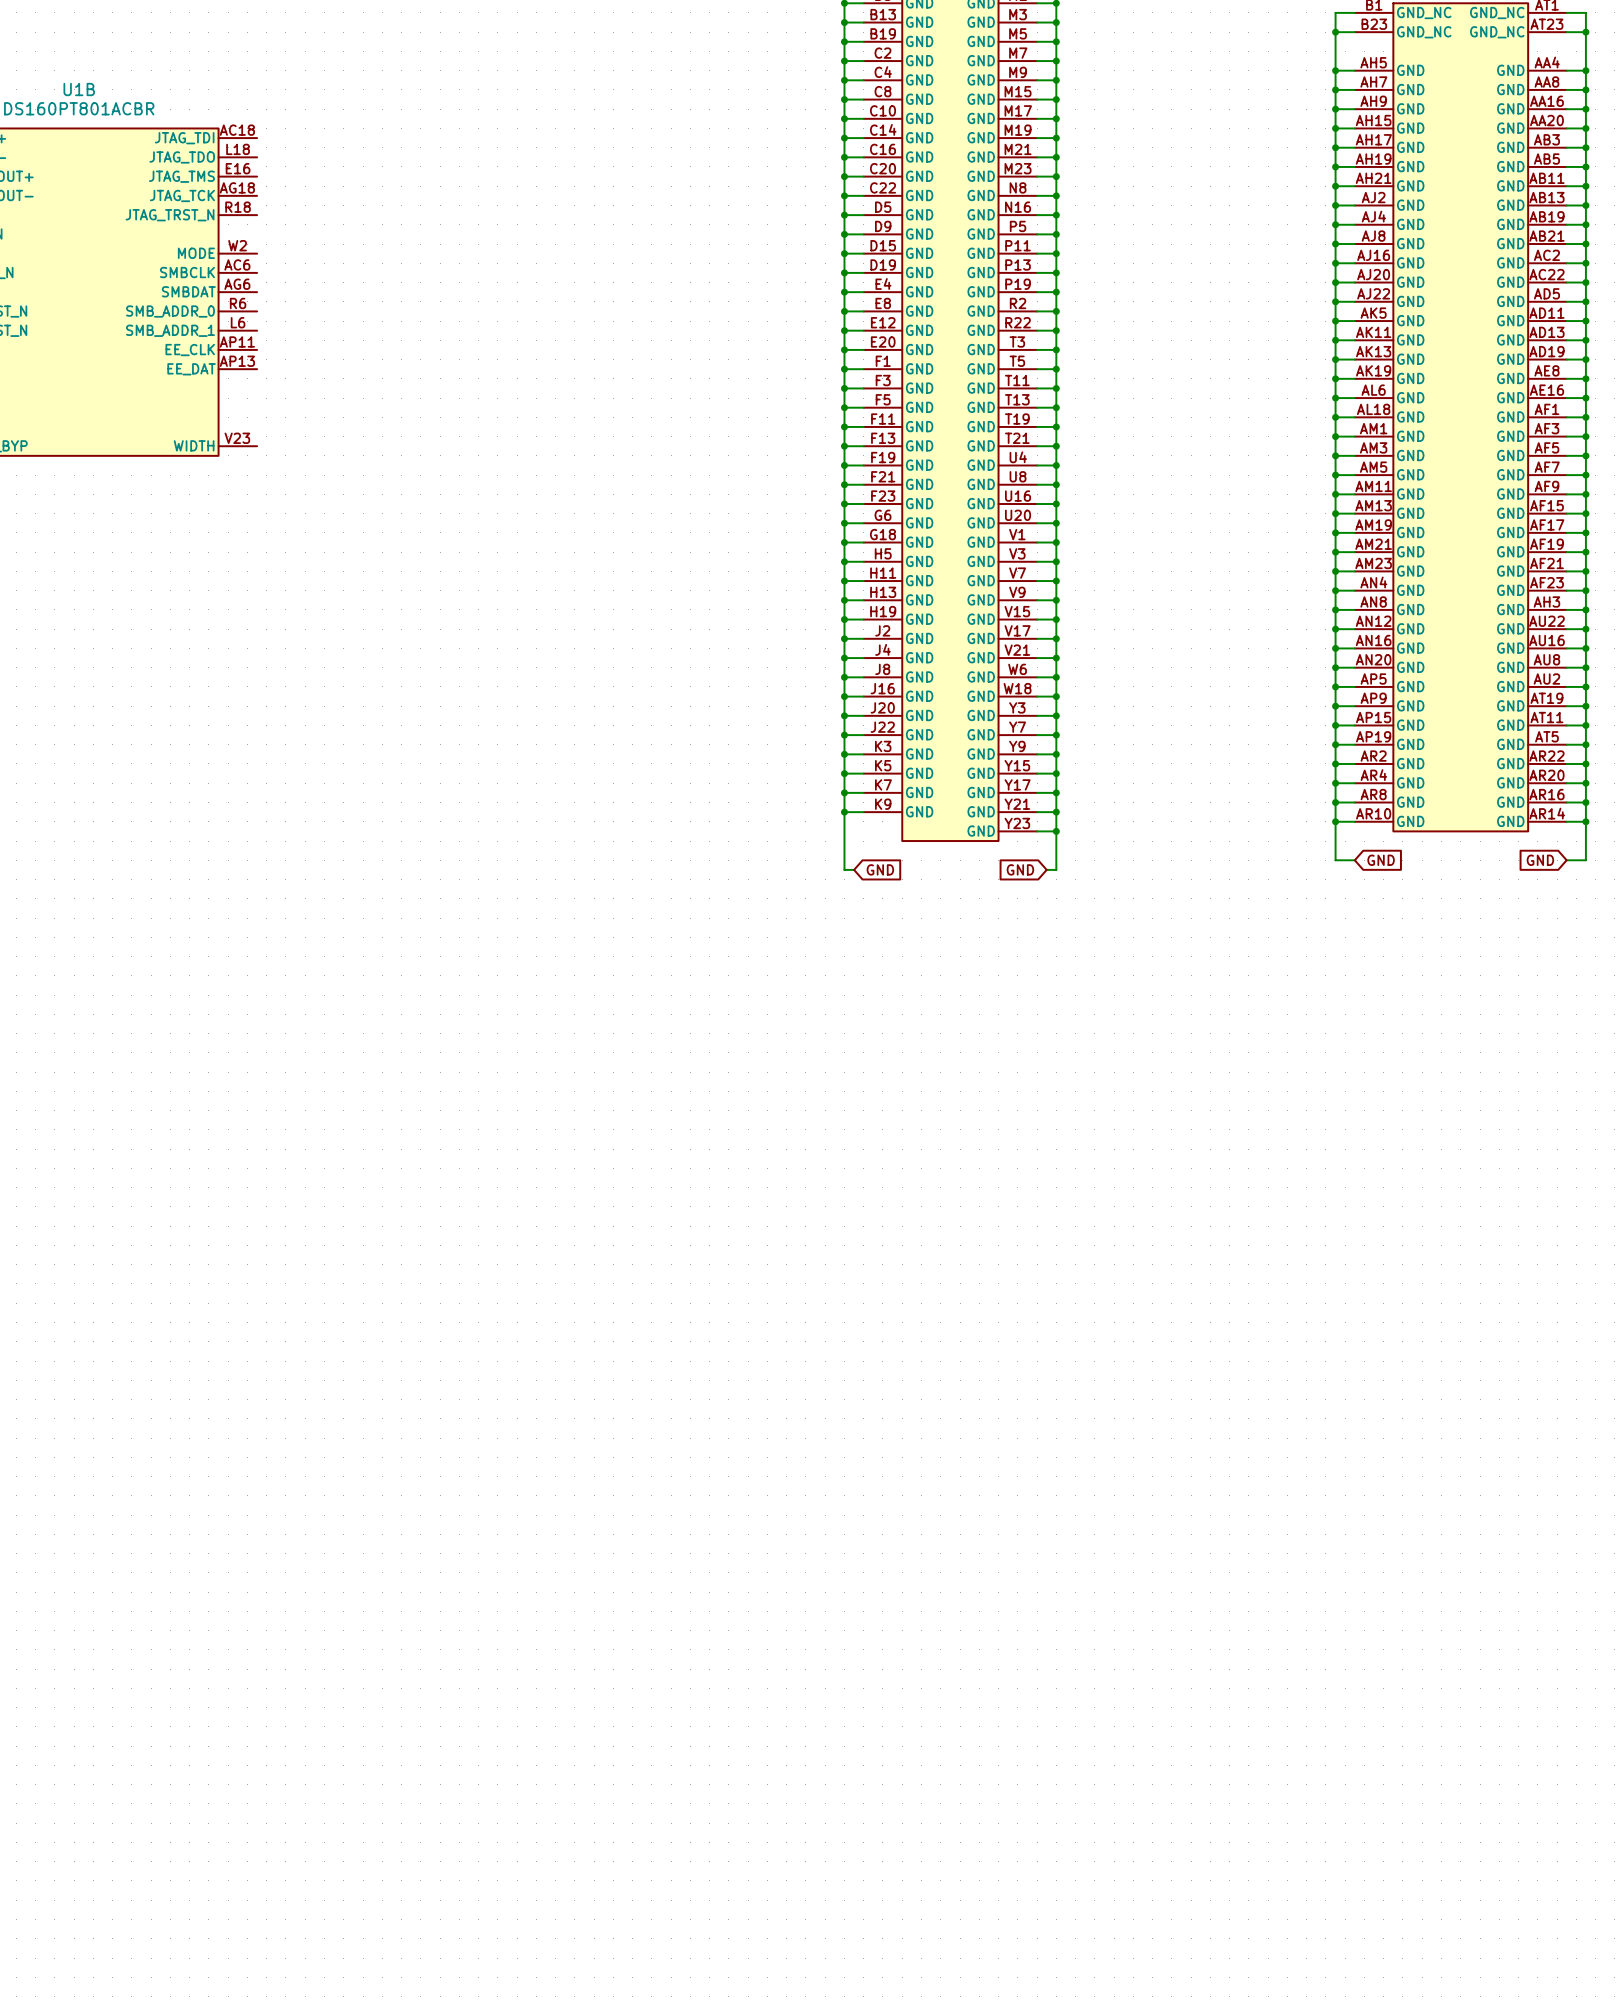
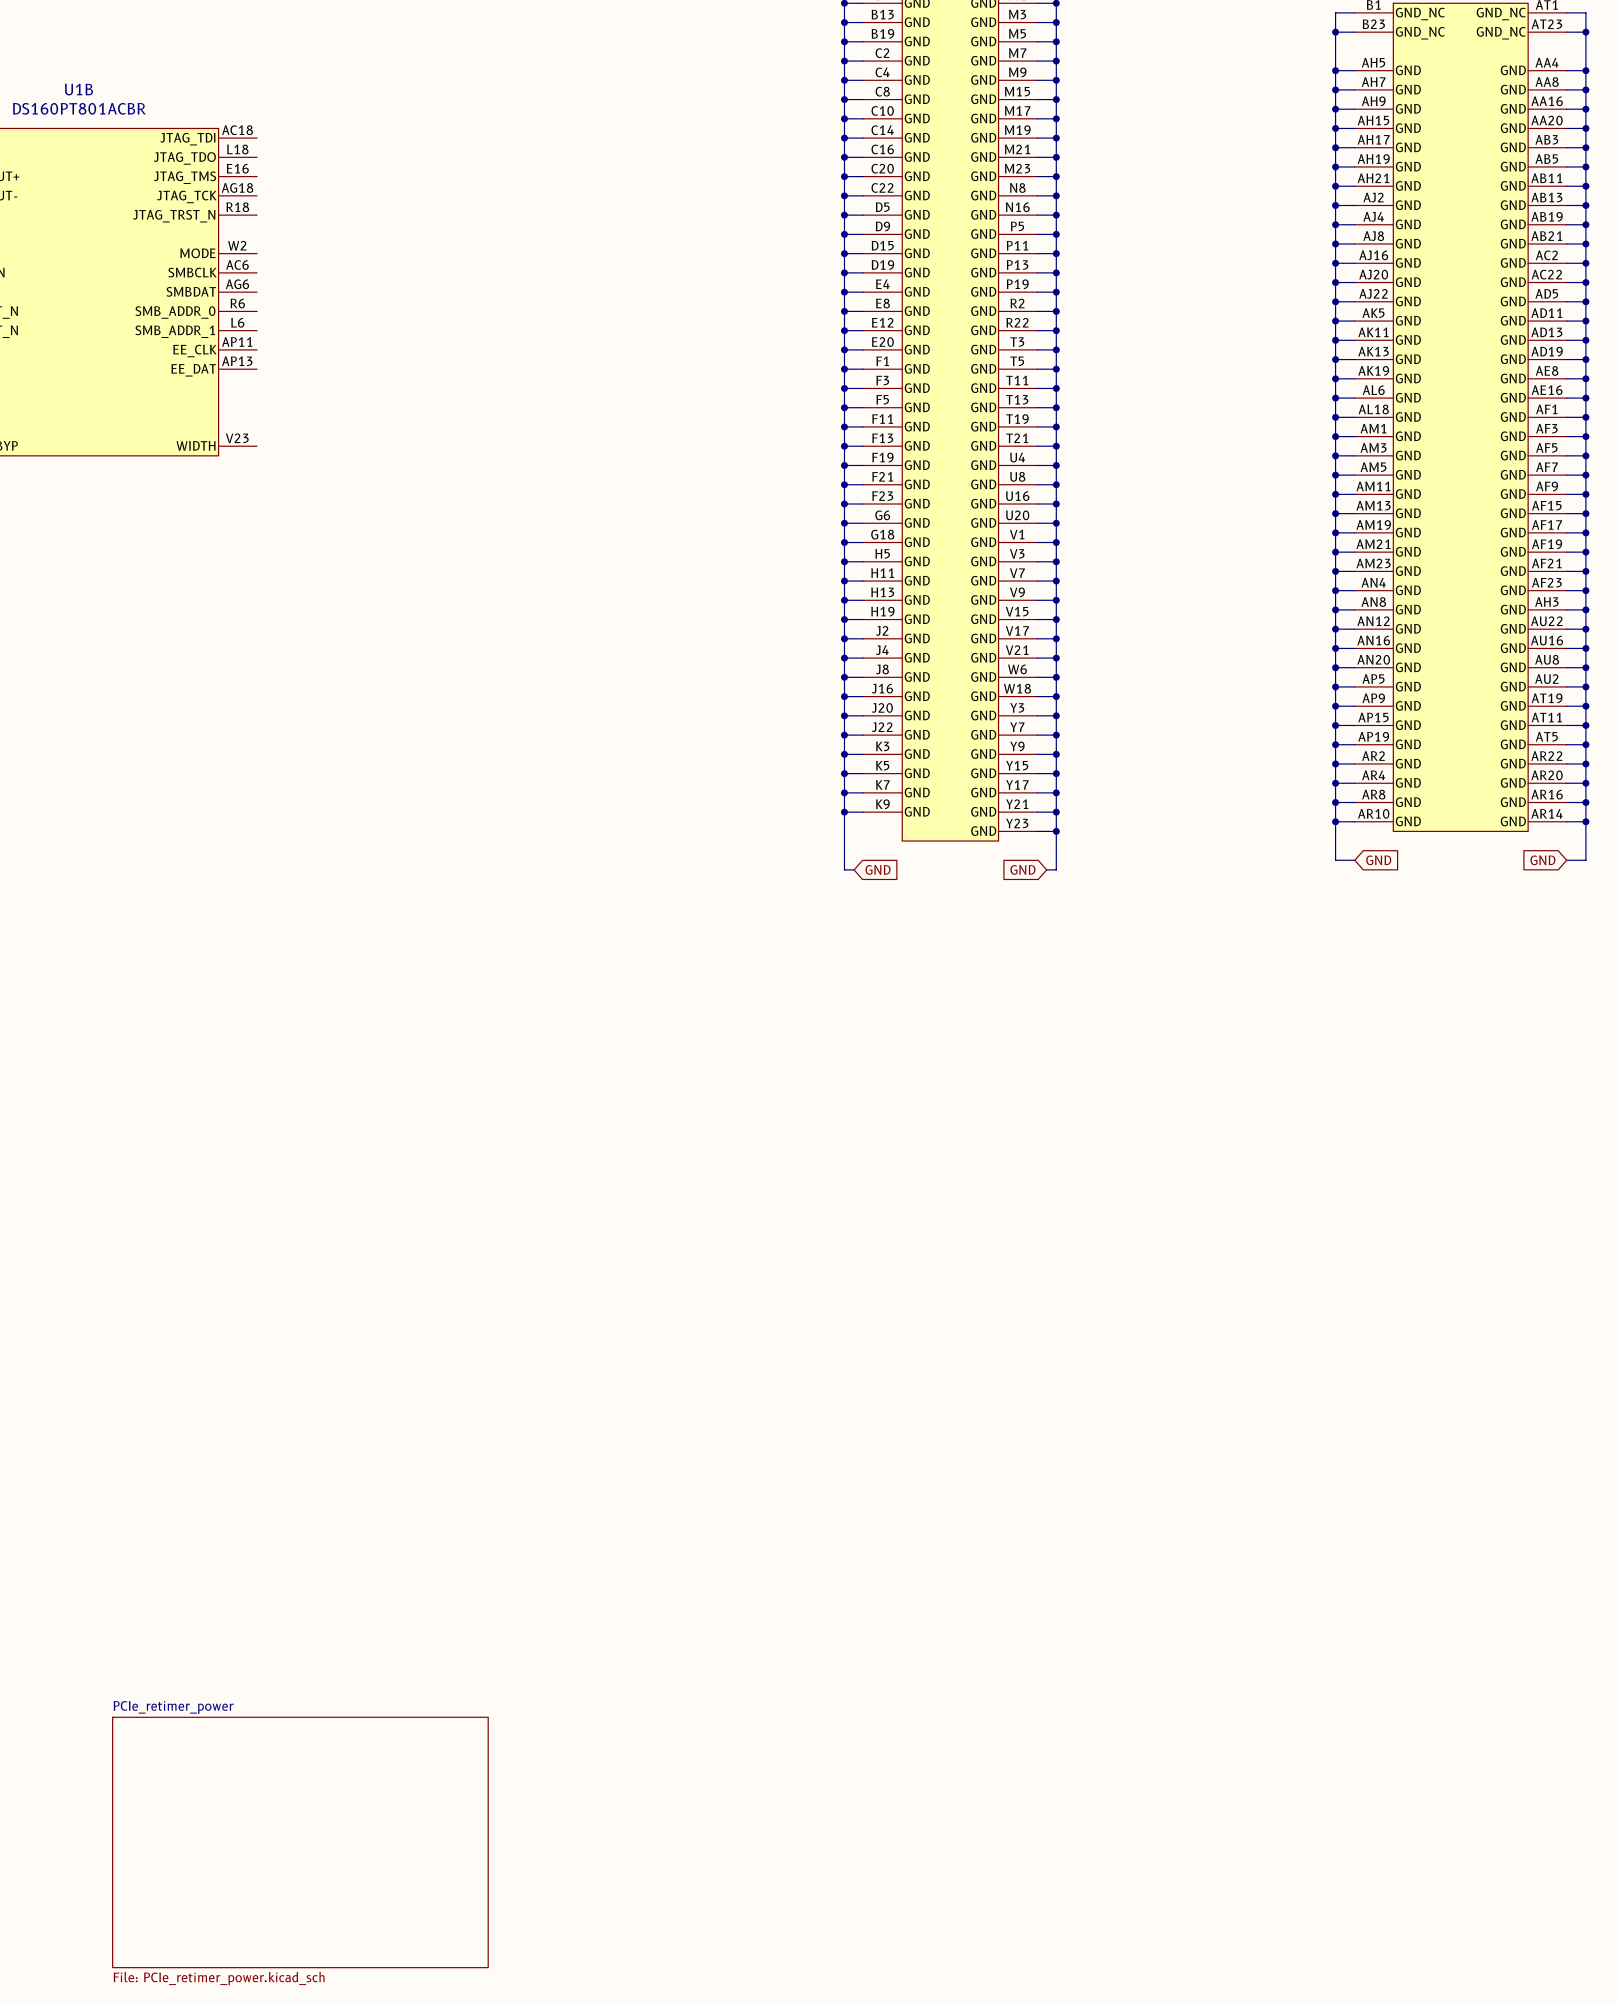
sheet PCIe_retimer_power: none -> File: PCIe_retimer_power.kicad_sch (300, 1842)

